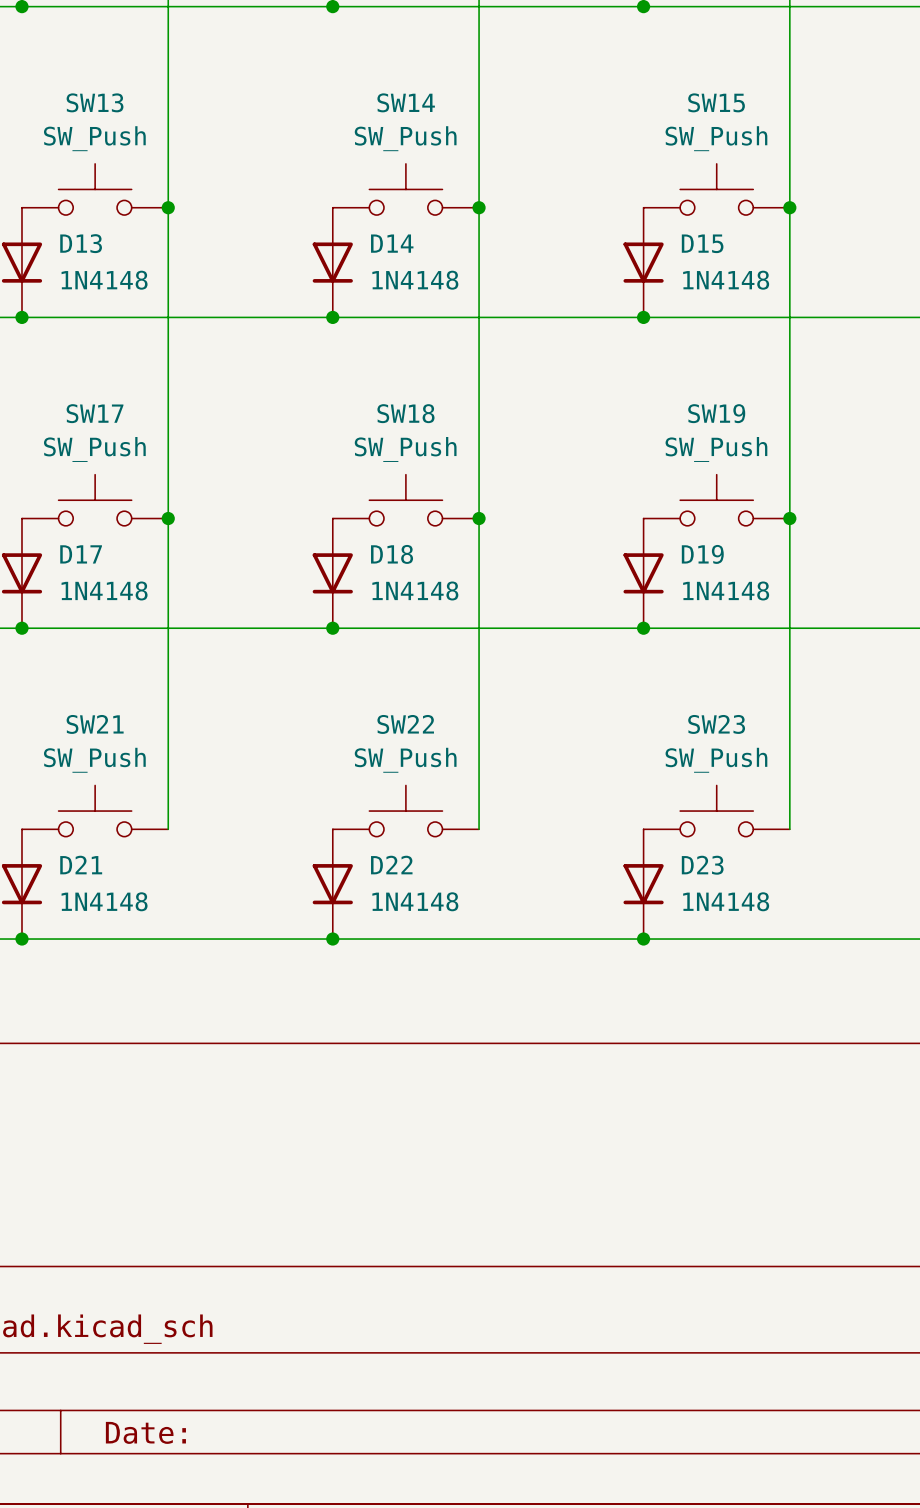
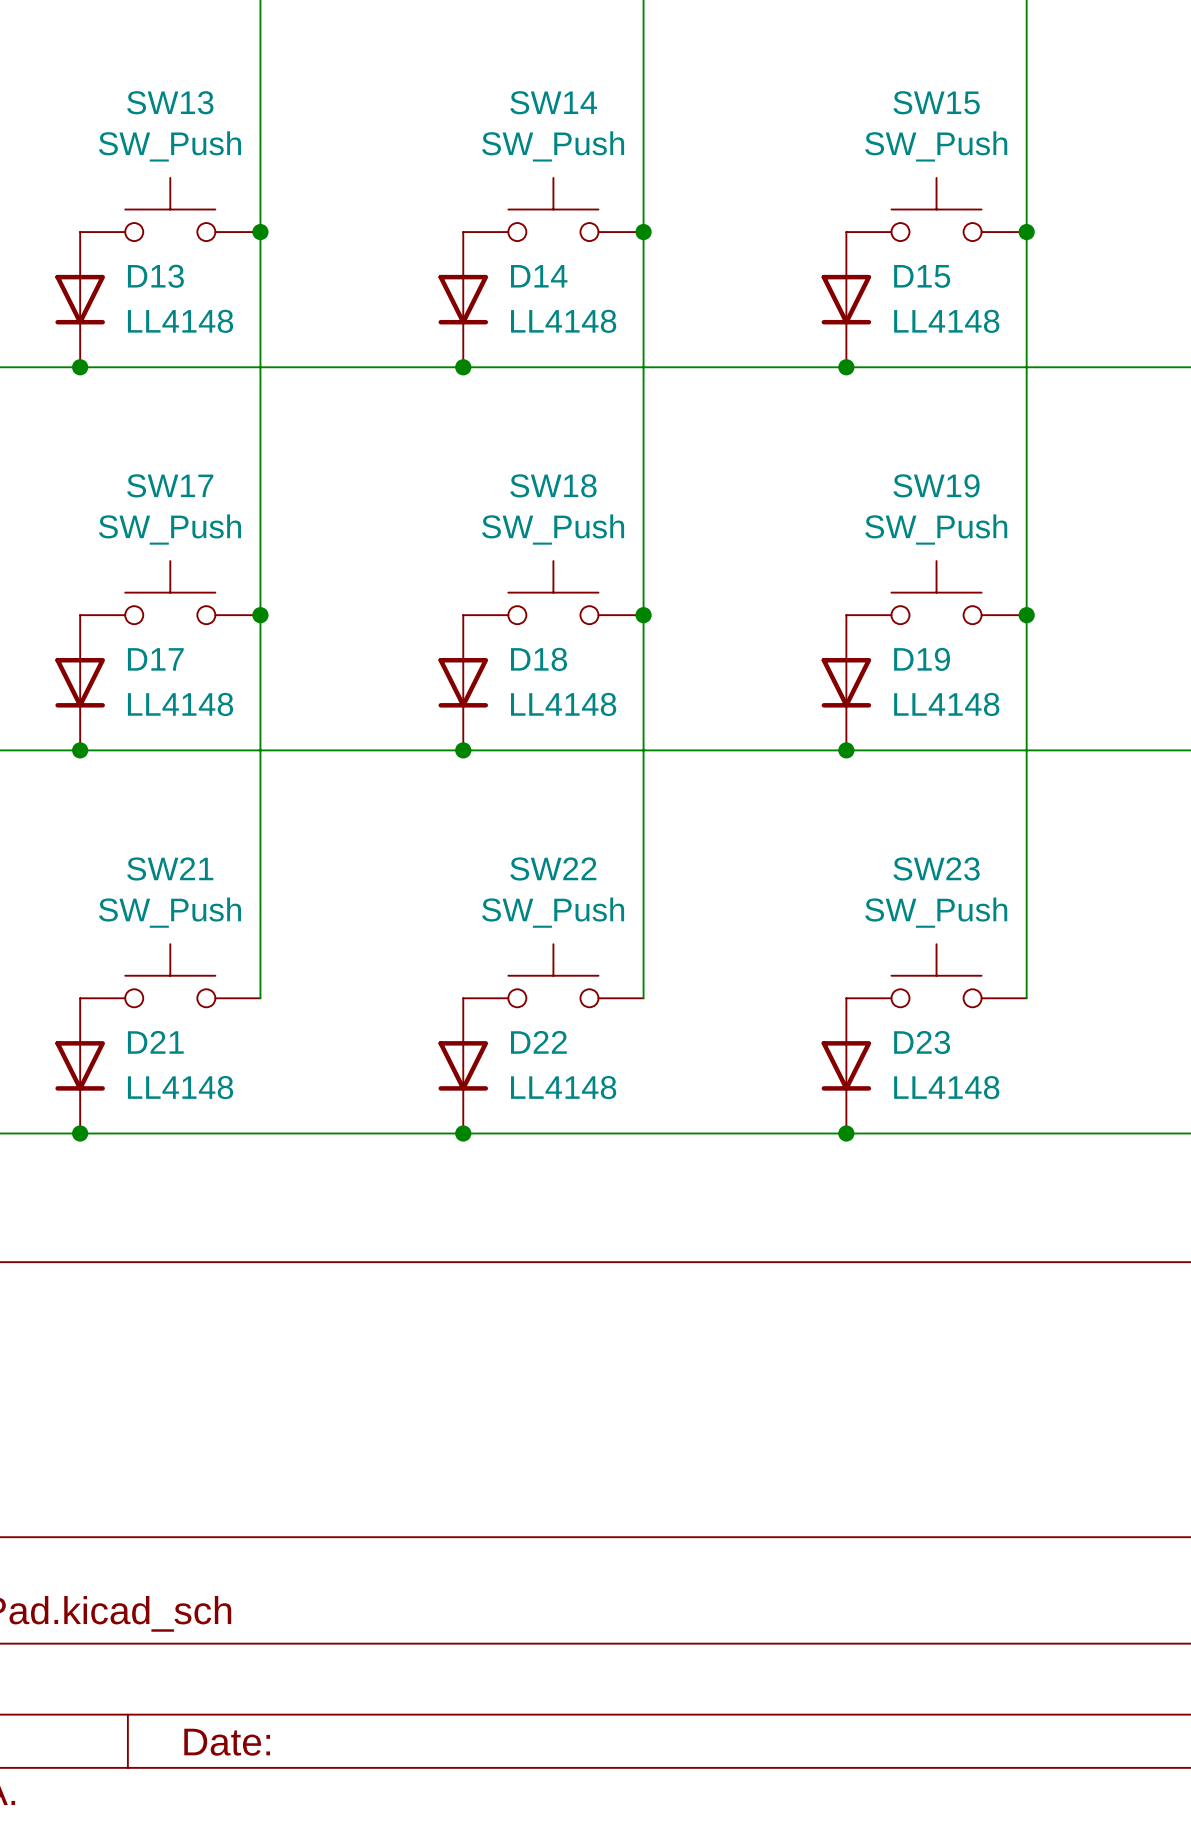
D13 value: 1N4148 (104, 280) -> LL4148 (180, 321)
D14 value: 1N4148 (415, 280) -> LL4148 (563, 321)
D15 value: 1N4148 (726, 280) -> LL4148 (946, 321)
D17 value: 1N4148 (104, 590) -> LL4148 (180, 704)
D18 value: 1N4148 (415, 590) -> LL4148 (563, 704)
D19 value: 1N4148 (726, 590) -> LL4148 (946, 704)
D21 value: 1N4148 (104, 901) -> LL4148 (180, 1087)
D22 value: 1N4148 (415, 901) -> LL4148 (563, 1087)
D23 value: 1N4148 (726, 901) -> LL4148 (946, 1087)

